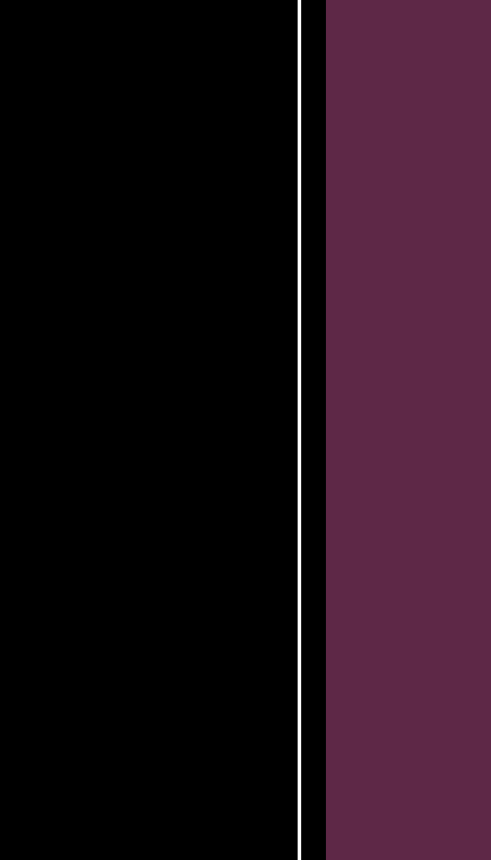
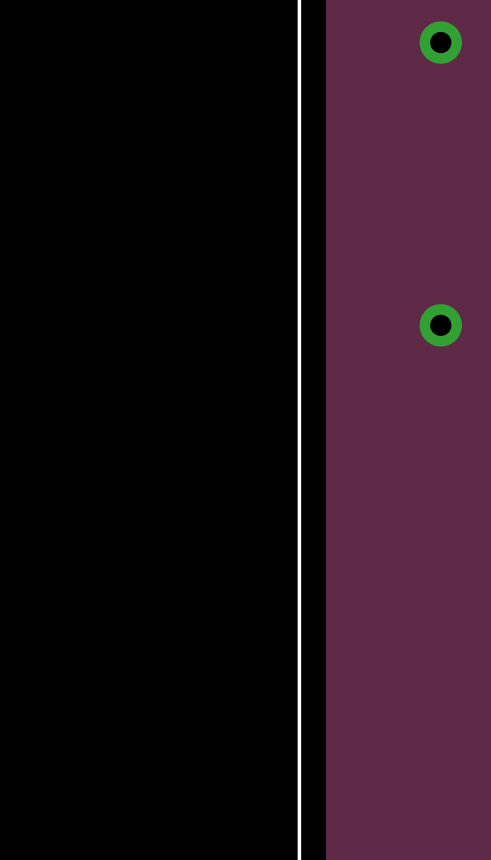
via: none -> (440, 42)
via: none -> (440, 325)

